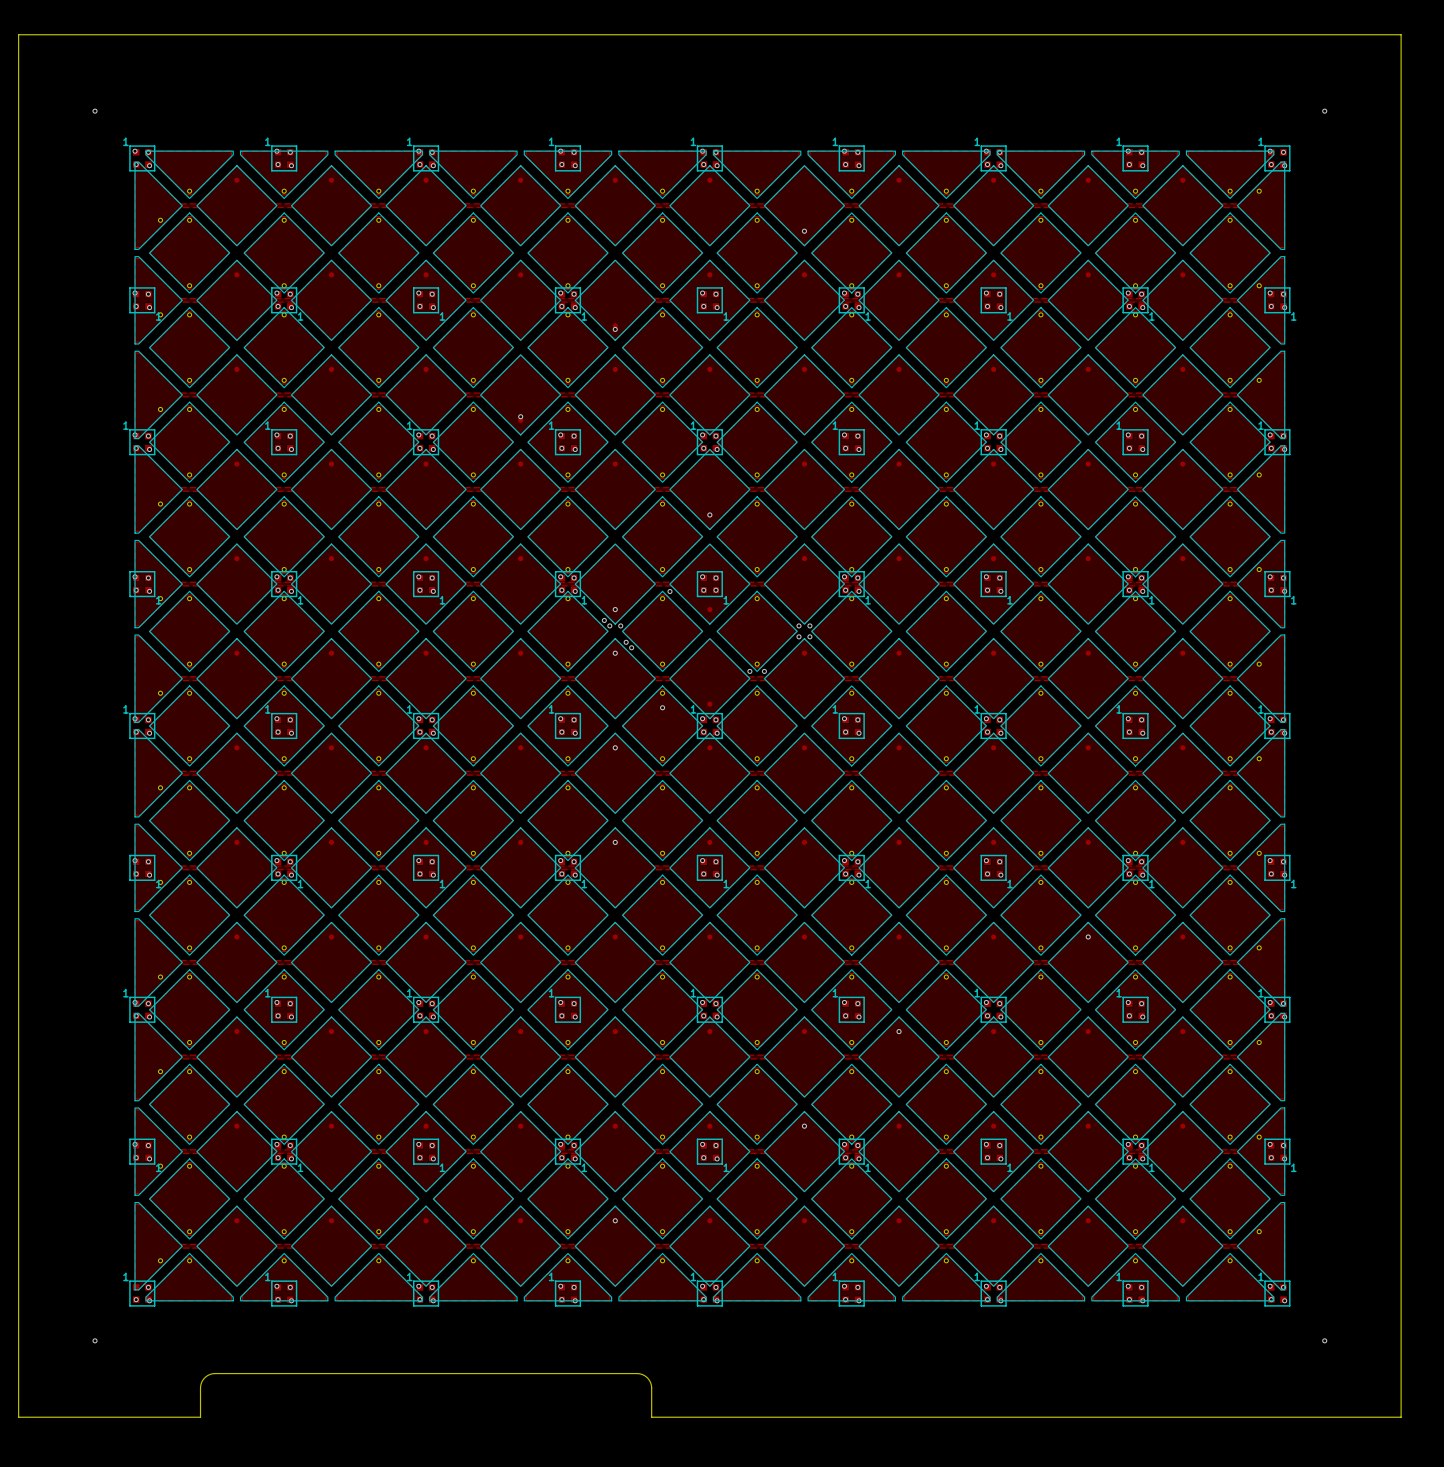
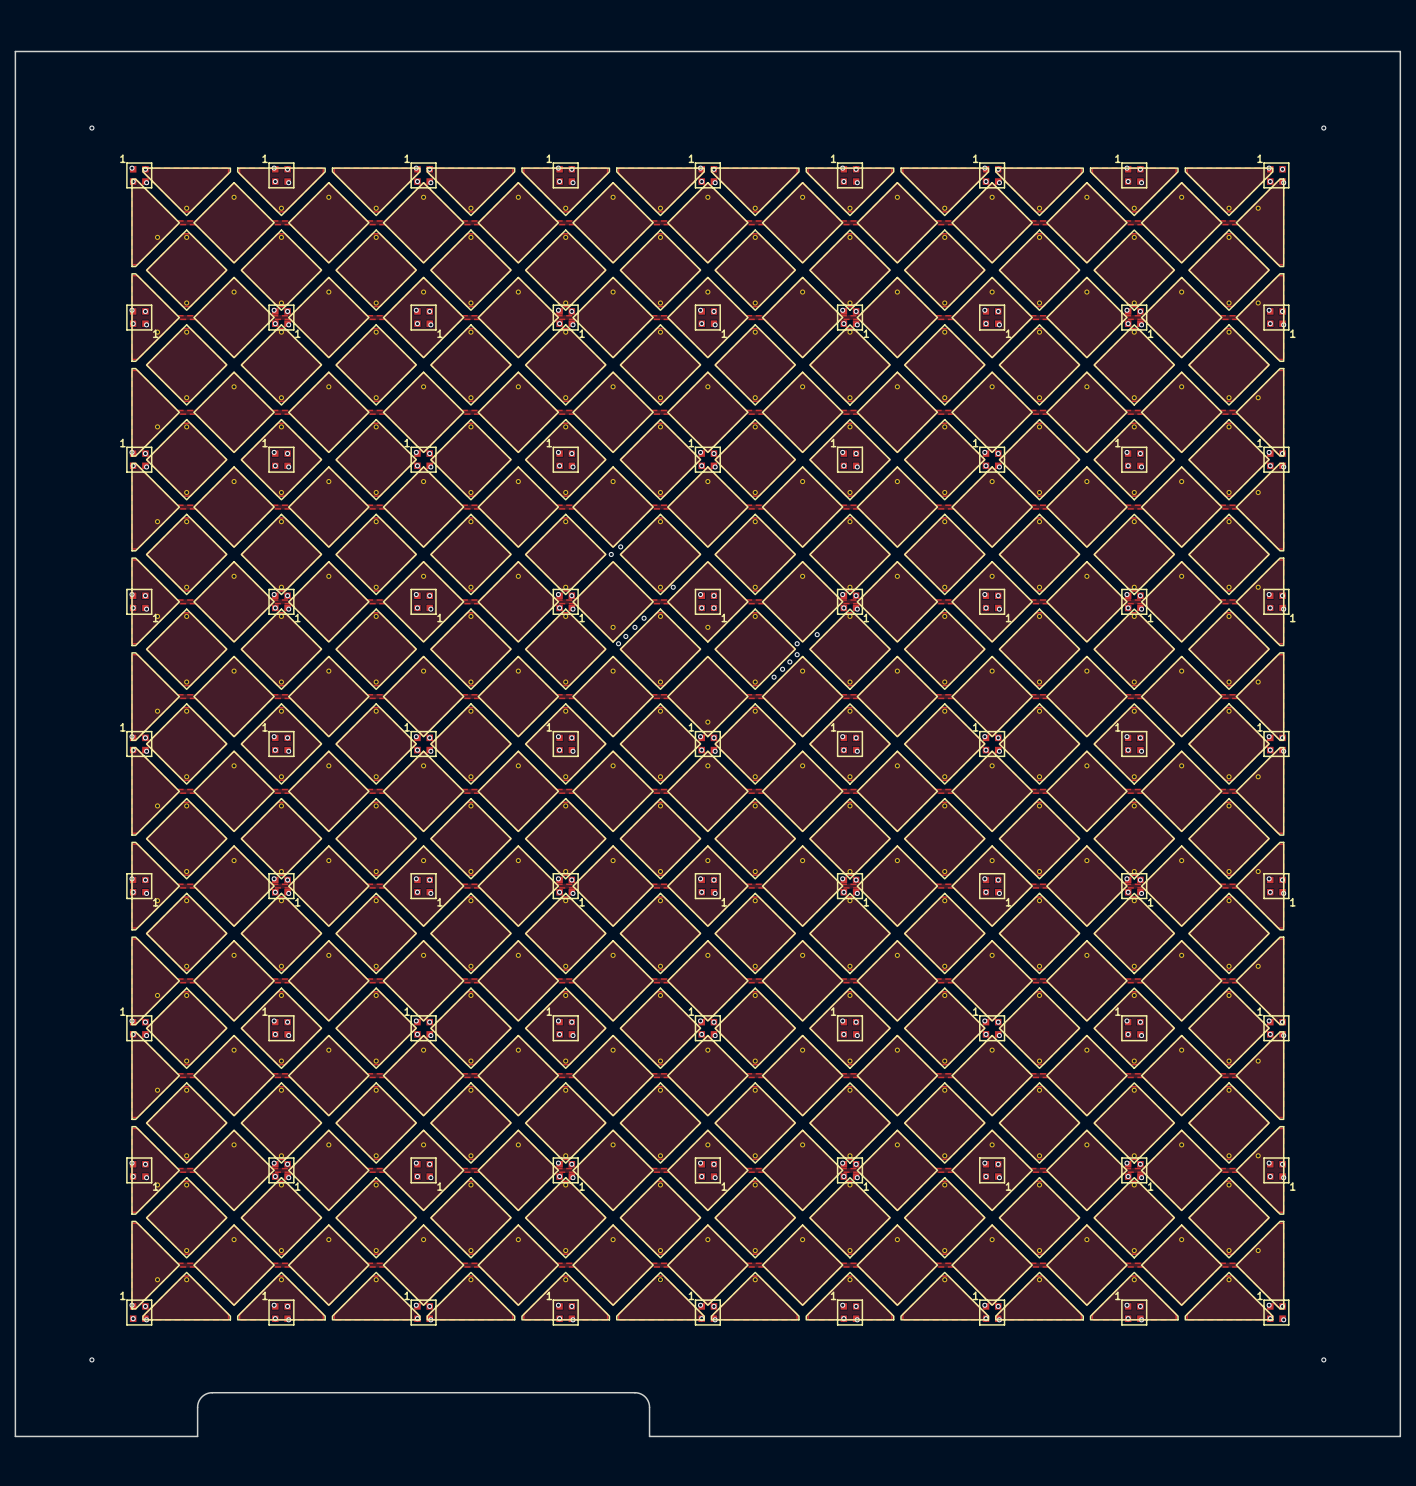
part footprint: [196, 165, 278, 247] -> [193, 182, 275, 264]
part footprint: [291, 165, 372, 247] -> [288, 182, 370, 264]
part footprint: [385, 165, 467, 247] -> [383, 182, 465, 264]
part footprint: [480, 165, 562, 247] -> [477, 182, 559, 264]
part footprint: [574, 165, 656, 247] -> [572, 182, 654, 264]
part footprint: [669, 165, 751, 247] -> [667, 182, 749, 264]
part footprint: [764, 165, 845, 247] -> [762, 182, 844, 264]
part footprint: [858, 165, 940, 247] -> [856, 182, 938, 264]
part footprint: [953, 165, 1035, 247] -> [951, 182, 1033, 264]
part footprint: [1047, 165, 1129, 247] -> [1046, 182, 1128, 264]
part footprint: [1142, 165, 1224, 247] -> [1141, 182, 1223, 264]
via: (804, 231) -> none
part footprint: [196, 259, 278, 341] -> [193, 277, 275, 359]
part footprint: [291, 259, 372, 341] -> [288, 277, 370, 359]
part footprint: [385, 259, 467, 341] -> [383, 277, 465, 359]
part footprint: [480, 259, 562, 341] -> [477, 277, 559, 359]
part footprint: [574, 259, 656, 341] -> [572, 277, 654, 359]
part footprint: [669, 259, 751, 341] -> [667, 277, 749, 359]
part footprint: [764, 259, 845, 341] -> [762, 277, 844, 359]
part footprint: [858, 259, 940, 341] -> [856, 277, 938, 359]
part footprint: [953, 259, 1035, 341] -> [951, 277, 1033, 359]
part footprint: [1047, 259, 1129, 341] -> [1046, 277, 1128, 359]
part footprint: [1142, 259, 1224, 341] -> [1141, 277, 1223, 359]
via: (615, 329) -> none
part footprint: [196, 354, 278, 436] -> [193, 371, 275, 453]
part footprint: [291, 354, 372, 436] -> [288, 371, 370, 453]
part footprint: [385, 354, 467, 436] -> [383, 371, 465, 453]
part footprint: [480, 354, 562, 436] -> [477, 371, 559, 453]
part footprint: [574, 354, 656, 436] -> [572, 371, 654, 453]
part footprint: [669, 354, 751, 436] -> [667, 371, 749, 453]
part footprint: [764, 354, 845, 436] -> [762, 371, 844, 453]
part footprint: [858, 354, 940, 436] -> [856, 371, 938, 453]
part footprint: [953, 354, 1035, 436] -> [951, 371, 1033, 453]
part footprint: [1047, 354, 1129, 436] -> [1046, 371, 1128, 453]
part footprint: [1142, 354, 1224, 436] -> [1141, 371, 1223, 453]
via: (520, 416) -> none
part footprint: [196, 449, 278, 530] -> [193, 466, 275, 548]
part footprint: [291, 449, 372, 530] -> [288, 466, 370, 548]
part footprint: [385, 449, 467, 530] -> [383, 466, 465, 548]
part footprint: [480, 449, 562, 530] -> [477, 466, 559, 548]
part footprint: [574, 449, 656, 530] -> [572, 466, 654, 548]
part footprint: [669, 449, 751, 530] -> [667, 466, 749, 548]
part footprint: [764, 449, 845, 530] -> [762, 466, 844, 548]
part footprint: [858, 449, 940, 530] -> [856, 466, 938, 548]
part footprint: [953, 449, 1035, 530] -> [951, 466, 1033, 548]
part footprint: [1047, 449, 1129, 530] -> [1046, 466, 1128, 548]
part footprint: [1142, 449, 1224, 530] -> [1141, 466, 1223, 548]
via: (709, 514) -> none
via: none -> (620, 546)
via: none -> (611, 554)
part footprint: [196, 543, 278, 625] -> [193, 561, 275, 643]
part footprint: [291, 543, 372, 625] -> [288, 561, 370, 643]
part footprint: [385, 543, 467, 625] -> [383, 561, 465, 643]
part footprint: [480, 543, 562, 625] -> [477, 561, 559, 643]
part footprint: [574, 543, 656, 625] -> [572, 561, 654, 643]
part footprint: [669, 543, 751, 625] -> [667, 561, 749, 643]
part footprint: [764, 543, 845, 625] -> [762, 561, 844, 643]
part footprint: [858, 543, 940, 625] -> [856, 561, 938, 643]
part footprint: [953, 543, 1035, 625] -> [951, 561, 1033, 643]
part footprint: [1047, 543, 1129, 625] -> [1046, 561, 1128, 643]
part footprint: [1142, 543, 1224, 625] -> [1141, 561, 1223, 643]
via: none -> (673, 587)
via: (669, 591) -> none
via: none -> (644, 618)
via: (615, 609) -> none
via: none -> (634, 627)
via: none -> (817, 634)
via: none -> (625, 636)
via: (604, 620) -> none
via: (609, 625) -> none
via: (809, 625) -> none
via: (809, 636) -> none
part footprint: [196, 638, 278, 720] -> [193, 656, 275, 738]
part footprint: [291, 638, 372, 720] -> [288, 656, 370, 738]
part footprint: [385, 638, 467, 720] -> [383, 656, 465, 738]
part footprint: [480, 638, 562, 720] -> [477, 656, 559, 738]
part footprint: [574, 638, 656, 720] -> [572, 656, 654, 738]
part footprint: [669, 638, 751, 720] -> [667, 656, 749, 738]
part footprint: [764, 638, 845, 720] -> [762, 656, 844, 738]
part footprint: [858, 638, 940, 720] -> [856, 656, 938, 738]
part footprint: [953, 638, 1035, 720] -> [951, 656, 1033, 738]
part footprint: [1047, 638, 1129, 720] -> [1046, 656, 1128, 738]
part footprint: [1142, 638, 1224, 720] -> [1141, 656, 1223, 738]
via: (626, 642) -> none
via: none -> (789, 661)
via: (631, 647) -> none
via: none -> (782, 669)
via: (615, 653) -> none
via: none -> (774, 677)
via: (749, 671) -> none
via: (764, 671) -> none
via: (662, 707) -> none
part footprint: [196, 732, 278, 814] -> [193, 750, 275, 832]
part footprint: [291, 732, 372, 814] -> [288, 750, 370, 832]
part footprint: [385, 732, 467, 814] -> [383, 750, 465, 832]
part footprint: [480, 732, 562, 814] -> [477, 750, 559, 832]
part footprint: [574, 732, 656, 814] -> [572, 750, 654, 832]
part footprint: [669, 732, 751, 814] -> [667, 750, 749, 832]
part footprint: [764, 732, 845, 814] -> [762, 750, 844, 832]
part footprint: [858, 732, 940, 814] -> [856, 750, 938, 832]
part footprint: [953, 732, 1035, 814] -> [951, 750, 1033, 832]
part footprint: [1047, 732, 1129, 814] -> [1046, 750, 1128, 832]
part footprint: [1142, 732, 1224, 814] -> [1141, 750, 1223, 832]
via: (615, 747) -> none
part footprint: [196, 827, 278, 909] -> [193, 845, 275, 927]
part footprint: [291, 827, 372, 909] -> [288, 845, 370, 927]
part footprint: [385, 827, 467, 909] -> [383, 845, 465, 927]
part footprint: [480, 827, 562, 909] -> [477, 845, 559, 927]
part footprint: [574, 827, 656, 909] -> [572, 845, 654, 927]
part footprint: [669, 827, 751, 909] -> [667, 845, 749, 927]
part footprint: [764, 827, 845, 909] -> [762, 845, 844, 927]
part footprint: [858, 827, 940, 909] -> [856, 845, 938, 927]
part footprint: [953, 827, 1035, 909] -> [951, 845, 1033, 927]
part footprint: [1047, 827, 1129, 909] -> [1046, 845, 1128, 927]
part footprint: [1142, 827, 1224, 909] -> [1141, 845, 1223, 927]
via: (615, 842) -> none
part footprint: [196, 922, 278, 1003] -> [193, 940, 275, 1022]
part footprint: [291, 922, 372, 1003] -> [288, 940, 370, 1022]
part footprint: [385, 922, 467, 1003] -> [383, 940, 465, 1022]
part footprint: [480, 922, 562, 1003] -> [477, 940, 559, 1022]
part footprint: [574, 922, 656, 1003] -> [572, 940, 654, 1022]
part footprint: [669, 922, 751, 1003] -> [667, 940, 749, 1022]
part footprint: [764, 922, 845, 1003] -> [762, 940, 844, 1022]
part footprint: [858, 922, 940, 1003] -> [856, 940, 938, 1022]
part footprint: [953, 922, 1035, 1003] -> [951, 940, 1033, 1022]
part footprint: [1047, 922, 1129, 1003] -> [1046, 940, 1128, 1022]
part footprint: [1142, 922, 1224, 1003] -> [1141, 940, 1223, 1022]
via: (1088, 936) -> none
part footprint: [196, 1016, 278, 1098] -> [193, 1035, 275, 1117]
part footprint: [291, 1016, 372, 1098] -> [288, 1035, 370, 1117]
part footprint: [385, 1016, 467, 1098] -> [383, 1035, 465, 1117]
part footprint: [480, 1016, 562, 1098] -> [477, 1035, 559, 1117]
part footprint: [574, 1016, 656, 1098] -> [572, 1035, 654, 1117]
part footprint: [669, 1016, 751, 1098] -> [667, 1035, 749, 1117]
part footprint: [764, 1016, 845, 1098] -> [762, 1035, 844, 1117]
part footprint: [858, 1016, 940, 1098] -> [856, 1035, 938, 1117]
part footprint: [953, 1016, 1035, 1098] -> [951, 1035, 1033, 1117]
part footprint: [1047, 1016, 1129, 1098] -> [1046, 1035, 1128, 1117]
part footprint: [1142, 1016, 1224, 1098] -> [1141, 1035, 1223, 1117]
via: (899, 1031) -> none
part footprint: [196, 1111, 278, 1193] -> [193, 1129, 275, 1211]
part footprint: [291, 1111, 372, 1193] -> [288, 1129, 370, 1211]
part footprint: [385, 1111, 467, 1193] -> [383, 1129, 465, 1211]
part footprint: [480, 1111, 562, 1193] -> [477, 1129, 559, 1211]
part footprint: [574, 1111, 656, 1193] -> [572, 1129, 654, 1211]
part footprint: [669, 1111, 751, 1193] -> [667, 1129, 749, 1211]
part footprint: [764, 1111, 845, 1193] -> [762, 1129, 844, 1211]
part footprint: [858, 1111, 940, 1193] -> [856, 1129, 938, 1211]
part footprint: [953, 1111, 1035, 1193] -> [951, 1129, 1033, 1211]
part footprint: [1047, 1111, 1129, 1193] -> [1046, 1129, 1128, 1211]
part footprint: [1142, 1111, 1224, 1193] -> [1141, 1129, 1223, 1211]
via: (804, 1126) -> none
part footprint: [196, 1205, 278, 1287] -> [193, 1224, 275, 1306]
part footprint: [291, 1205, 372, 1287] -> [288, 1224, 370, 1306]
part footprint: [385, 1205, 467, 1287] -> [383, 1224, 465, 1306]
part footprint: [480, 1205, 562, 1287] -> [477, 1224, 559, 1306]
part footprint: [574, 1205, 656, 1287] -> [572, 1224, 654, 1306]
part footprint: [669, 1205, 751, 1287] -> [667, 1224, 749, 1306]
part footprint: [764, 1205, 845, 1287] -> [762, 1224, 844, 1306]
part footprint: [858, 1205, 940, 1287] -> [856, 1224, 938, 1306]
part footprint: [953, 1205, 1035, 1287] -> [951, 1224, 1033, 1306]
part footprint: [1047, 1205, 1129, 1287] -> [1046, 1224, 1128, 1306]
part footprint: [1142, 1205, 1224, 1287] -> [1141, 1224, 1223, 1306]
via: (615, 1220) -> none
via: none -> (132, 1305)

